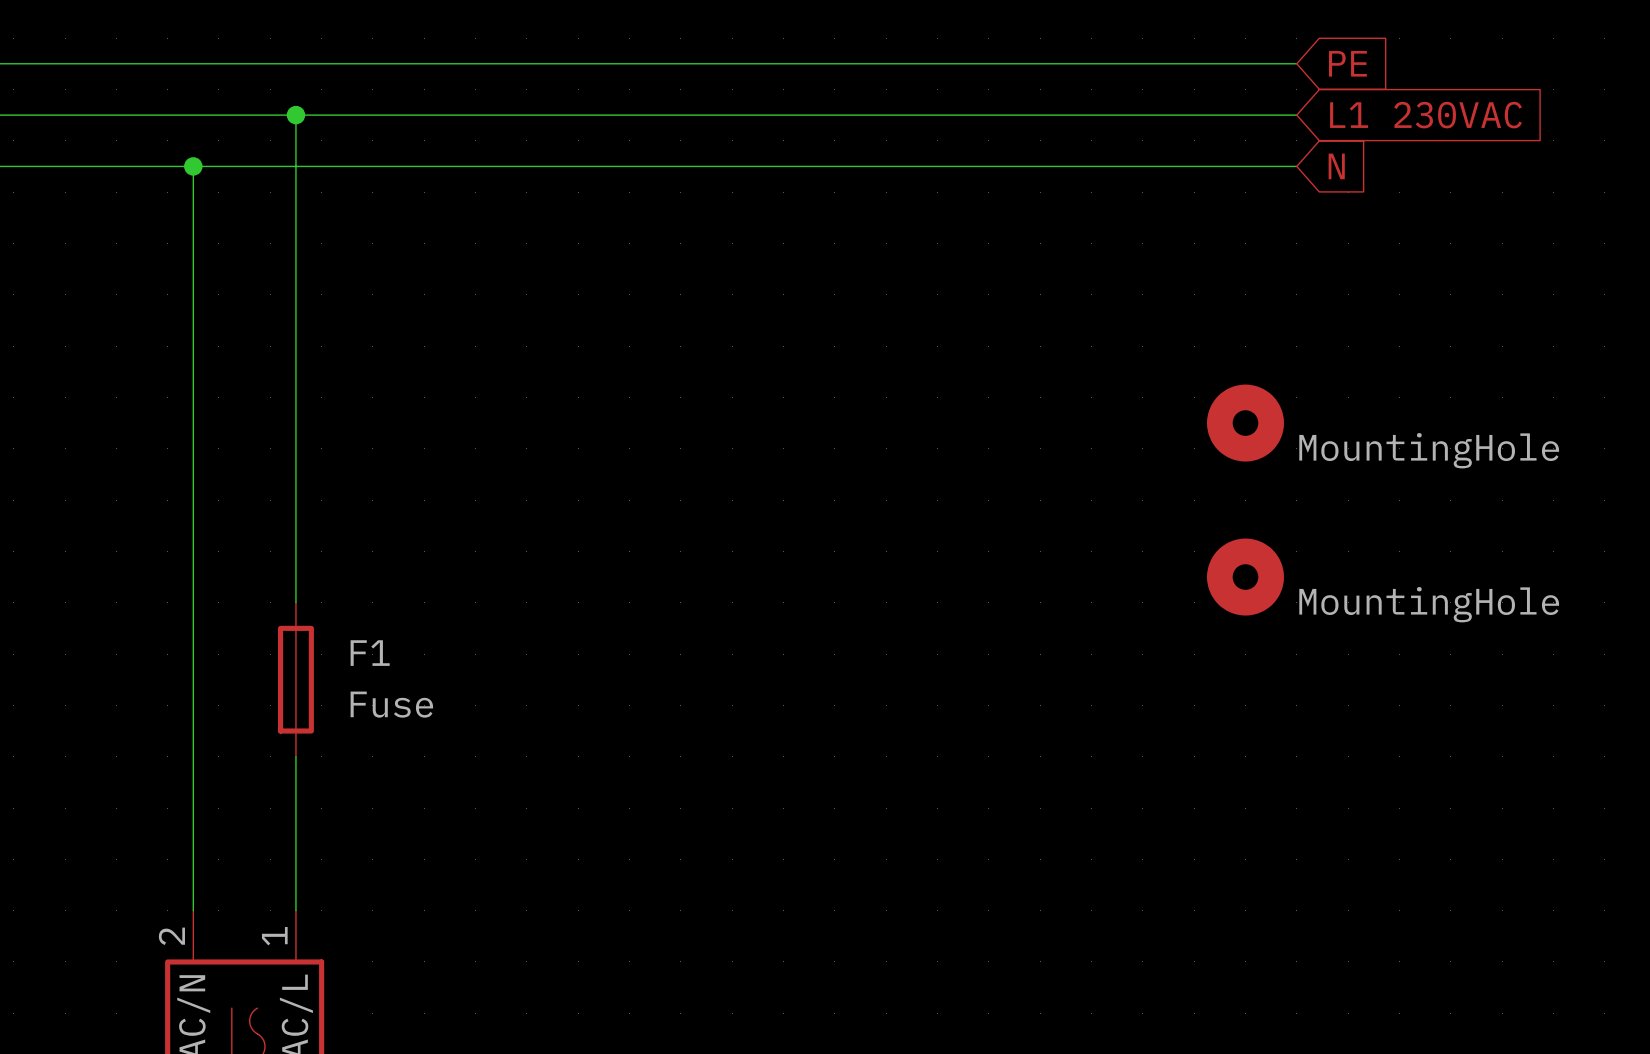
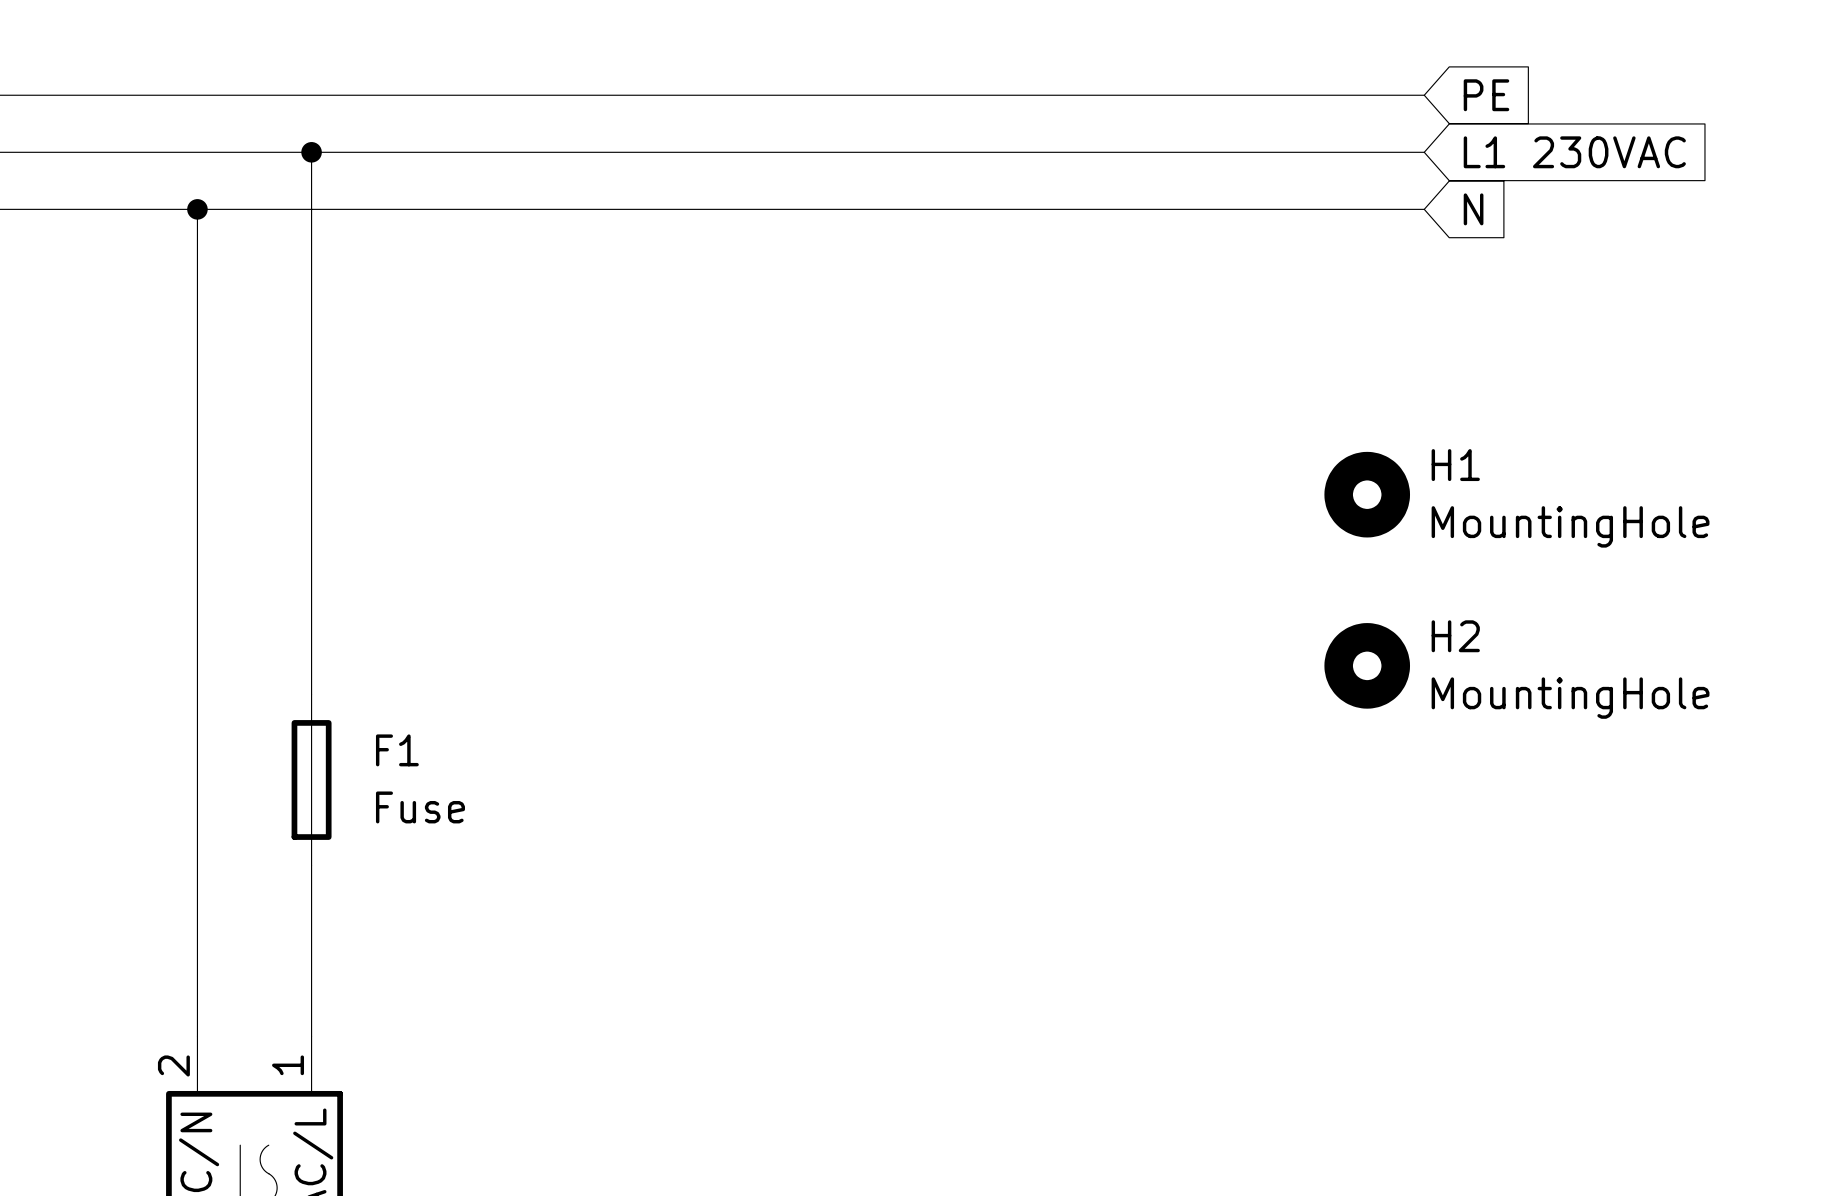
H1 name: none -> H1 (1455, 465)
H2 name: none -> H2 (1455, 636)

